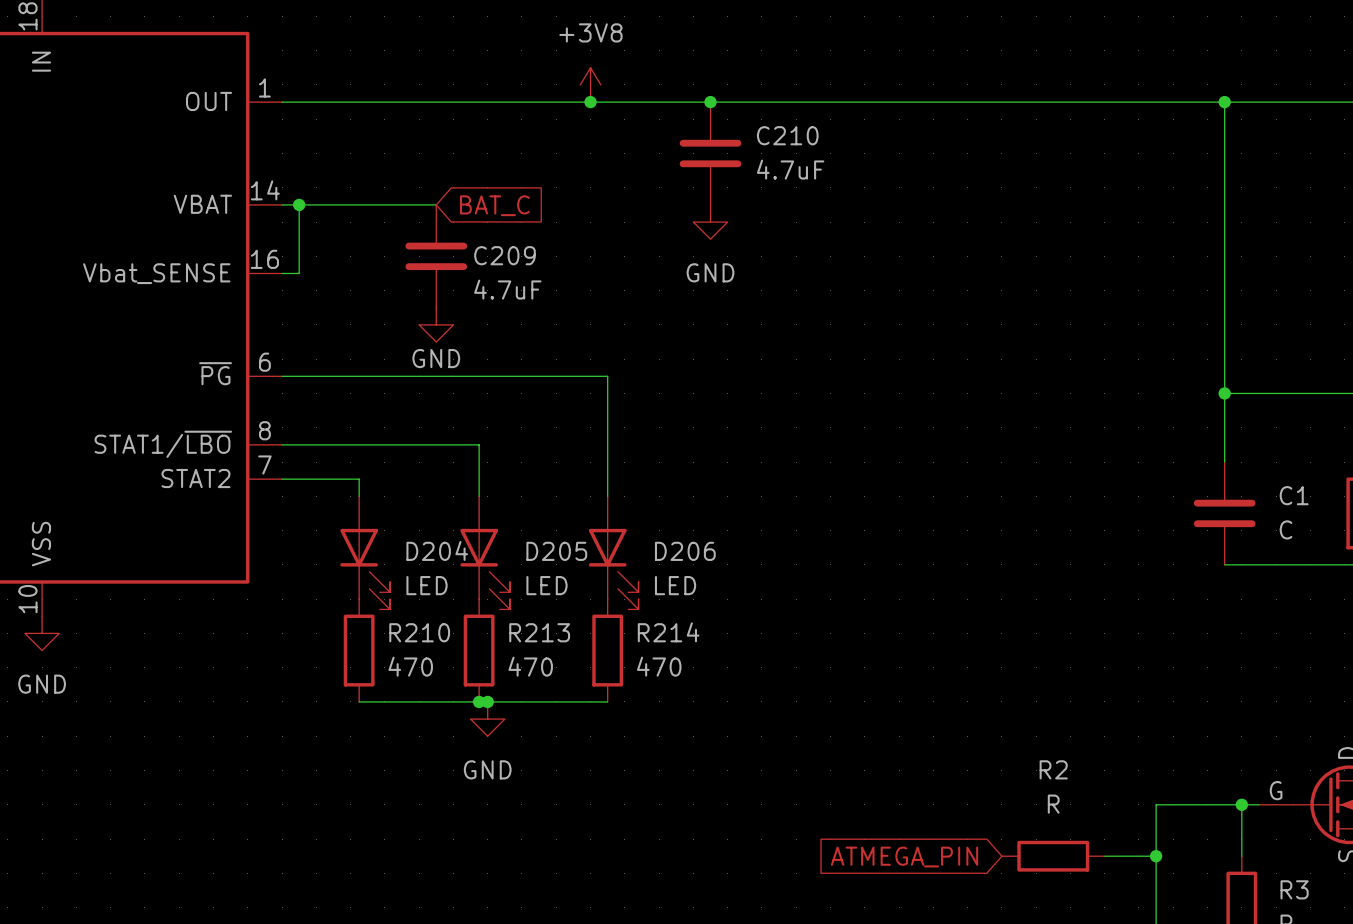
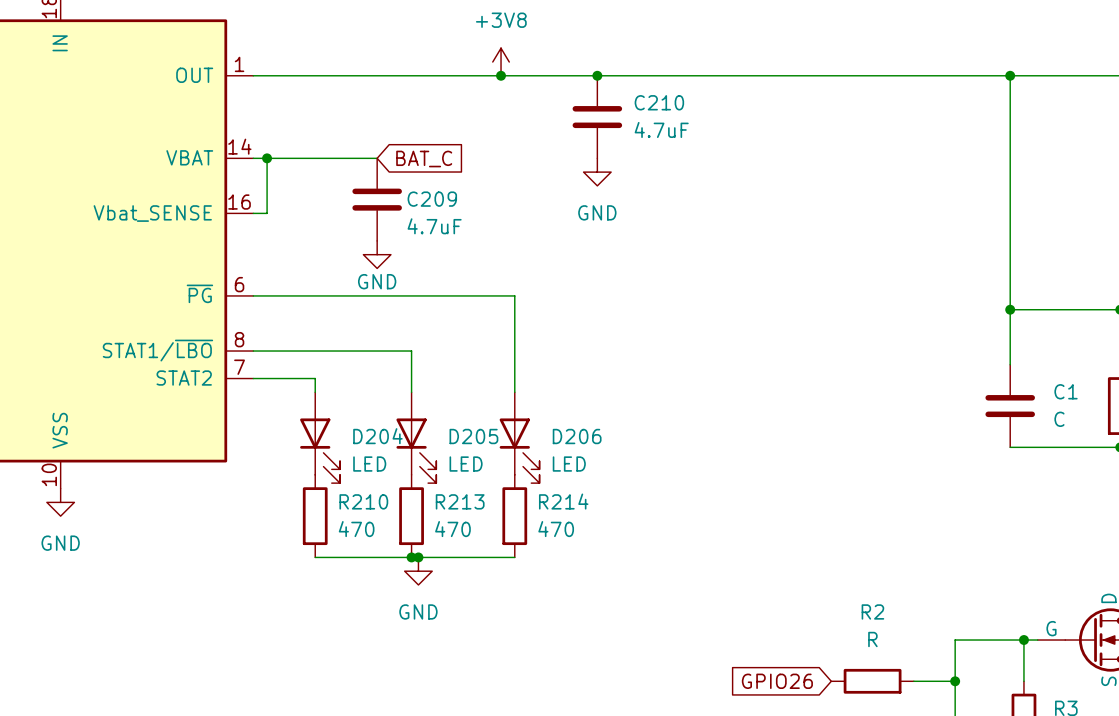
global label: ATMEGA_PIN (904, 857) -> GPIO26 (777, 681)

